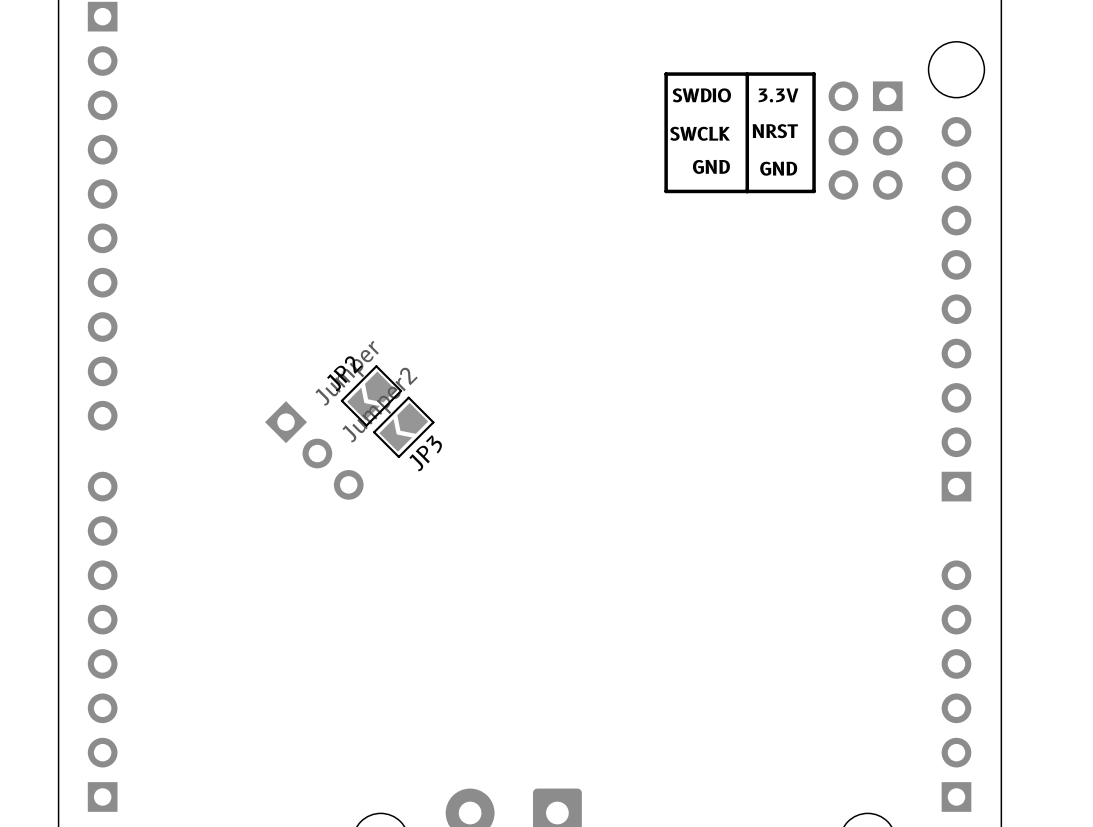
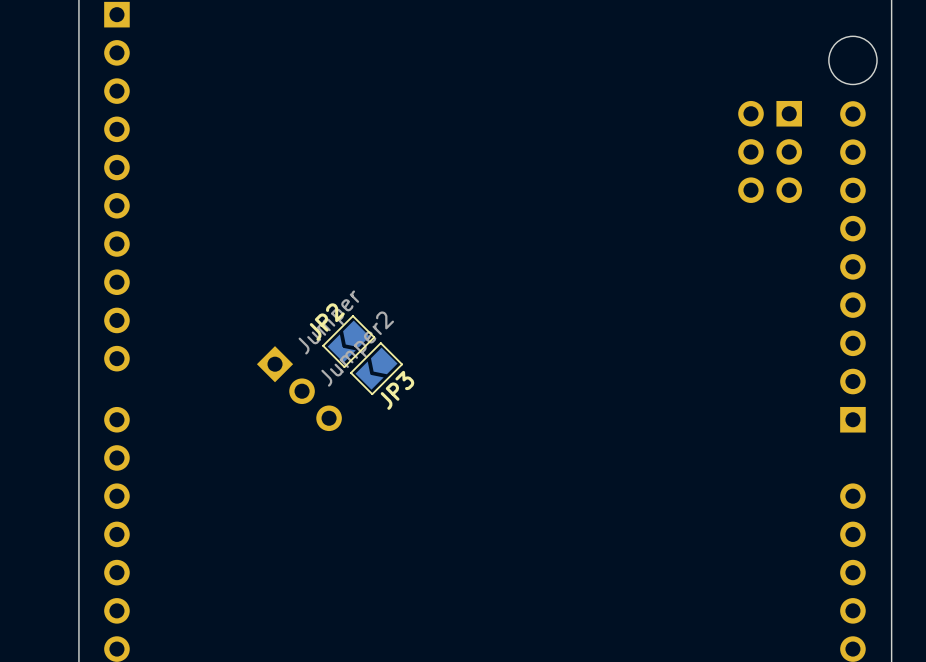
line: (747, 74) (747, 191) -> none
line: (814, 74) (666, 74) (666, 191) (814, 191) (814, 74) -> none
text: SWDIO (701, 95) -> none
text: 3.3V (778, 95) -> none
text: NRST (775, 131) -> none
text: SWCLK (700, 133) -> none
part position: (865, 140) -> (770, 151)
text: GND (711, 166) -> none
text: GND (778, 168) -> none

